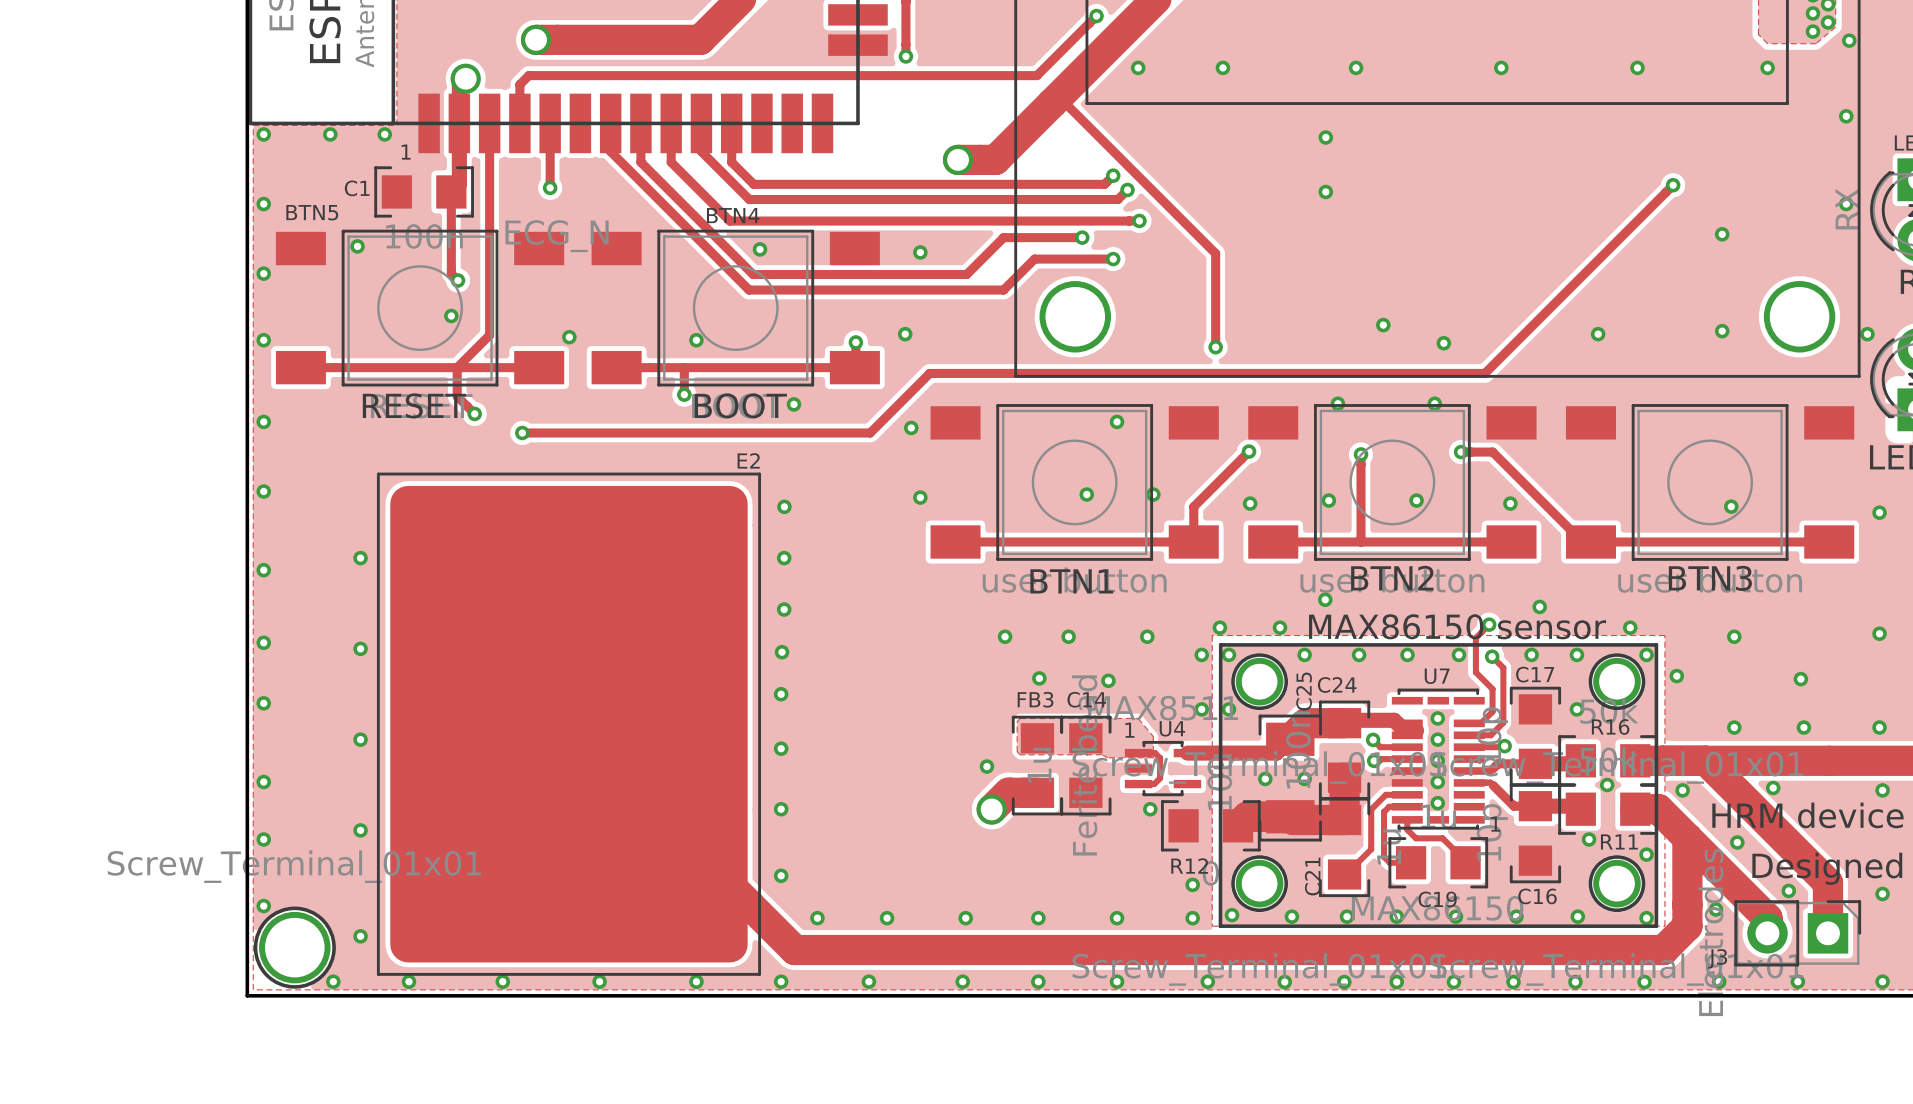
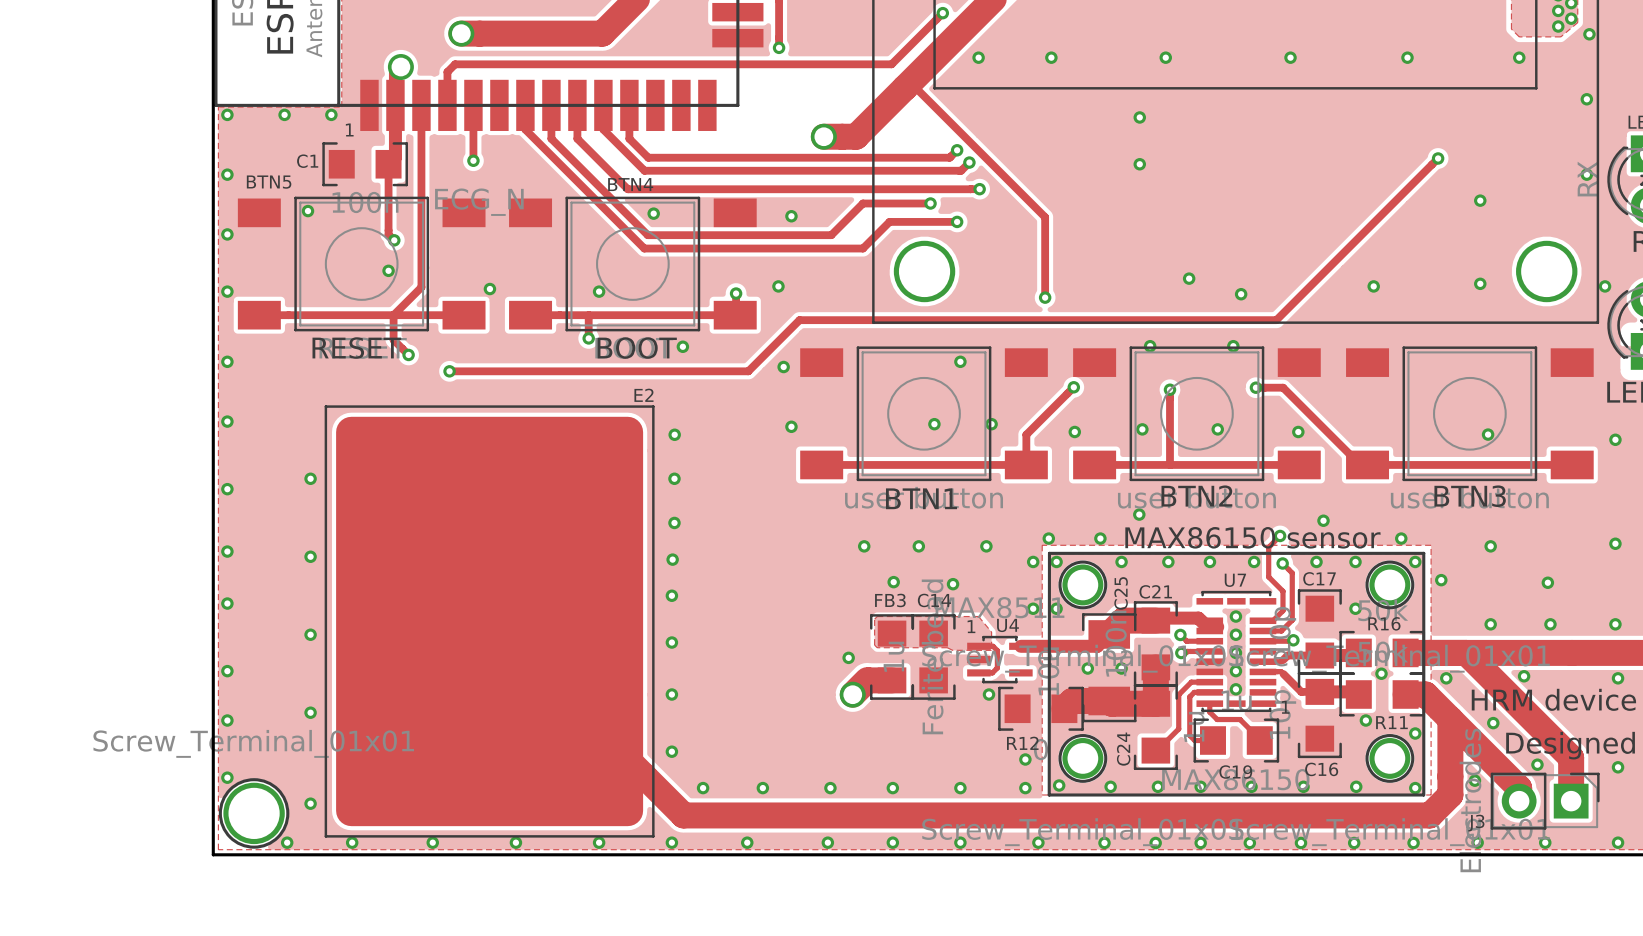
C24 name rotation: 0° (1337, 684) -> 90° counterclockwise (1123, 749)
C24 name position: C24 (1337, 684) -> C24 (1123, 749)
C21 name rotation: 0° (1312, 876) -> 90° clockwise (1155, 591)
C21 name position: C21 (1312, 876) -> C21 (1155, 591)

